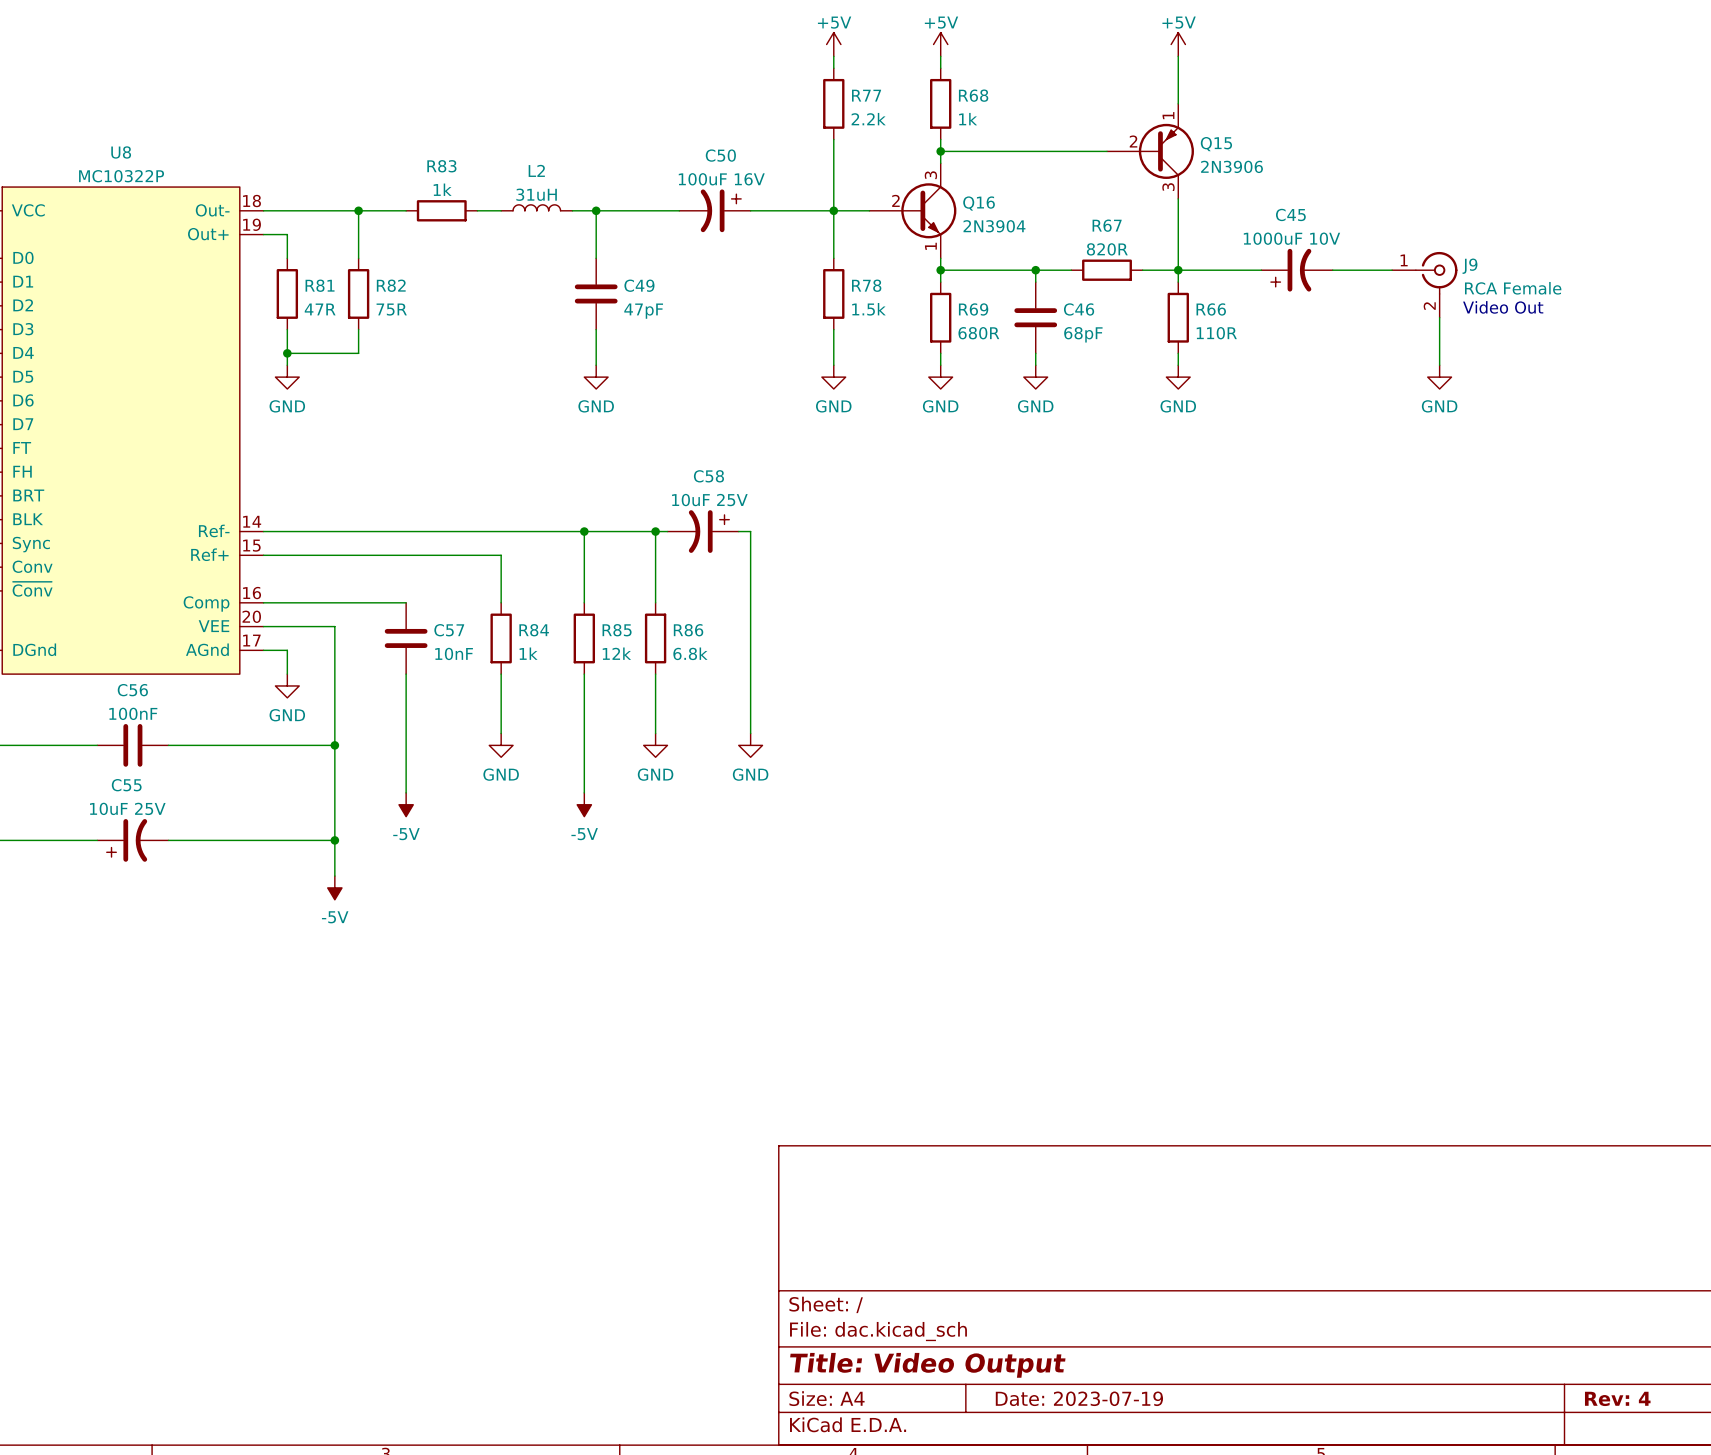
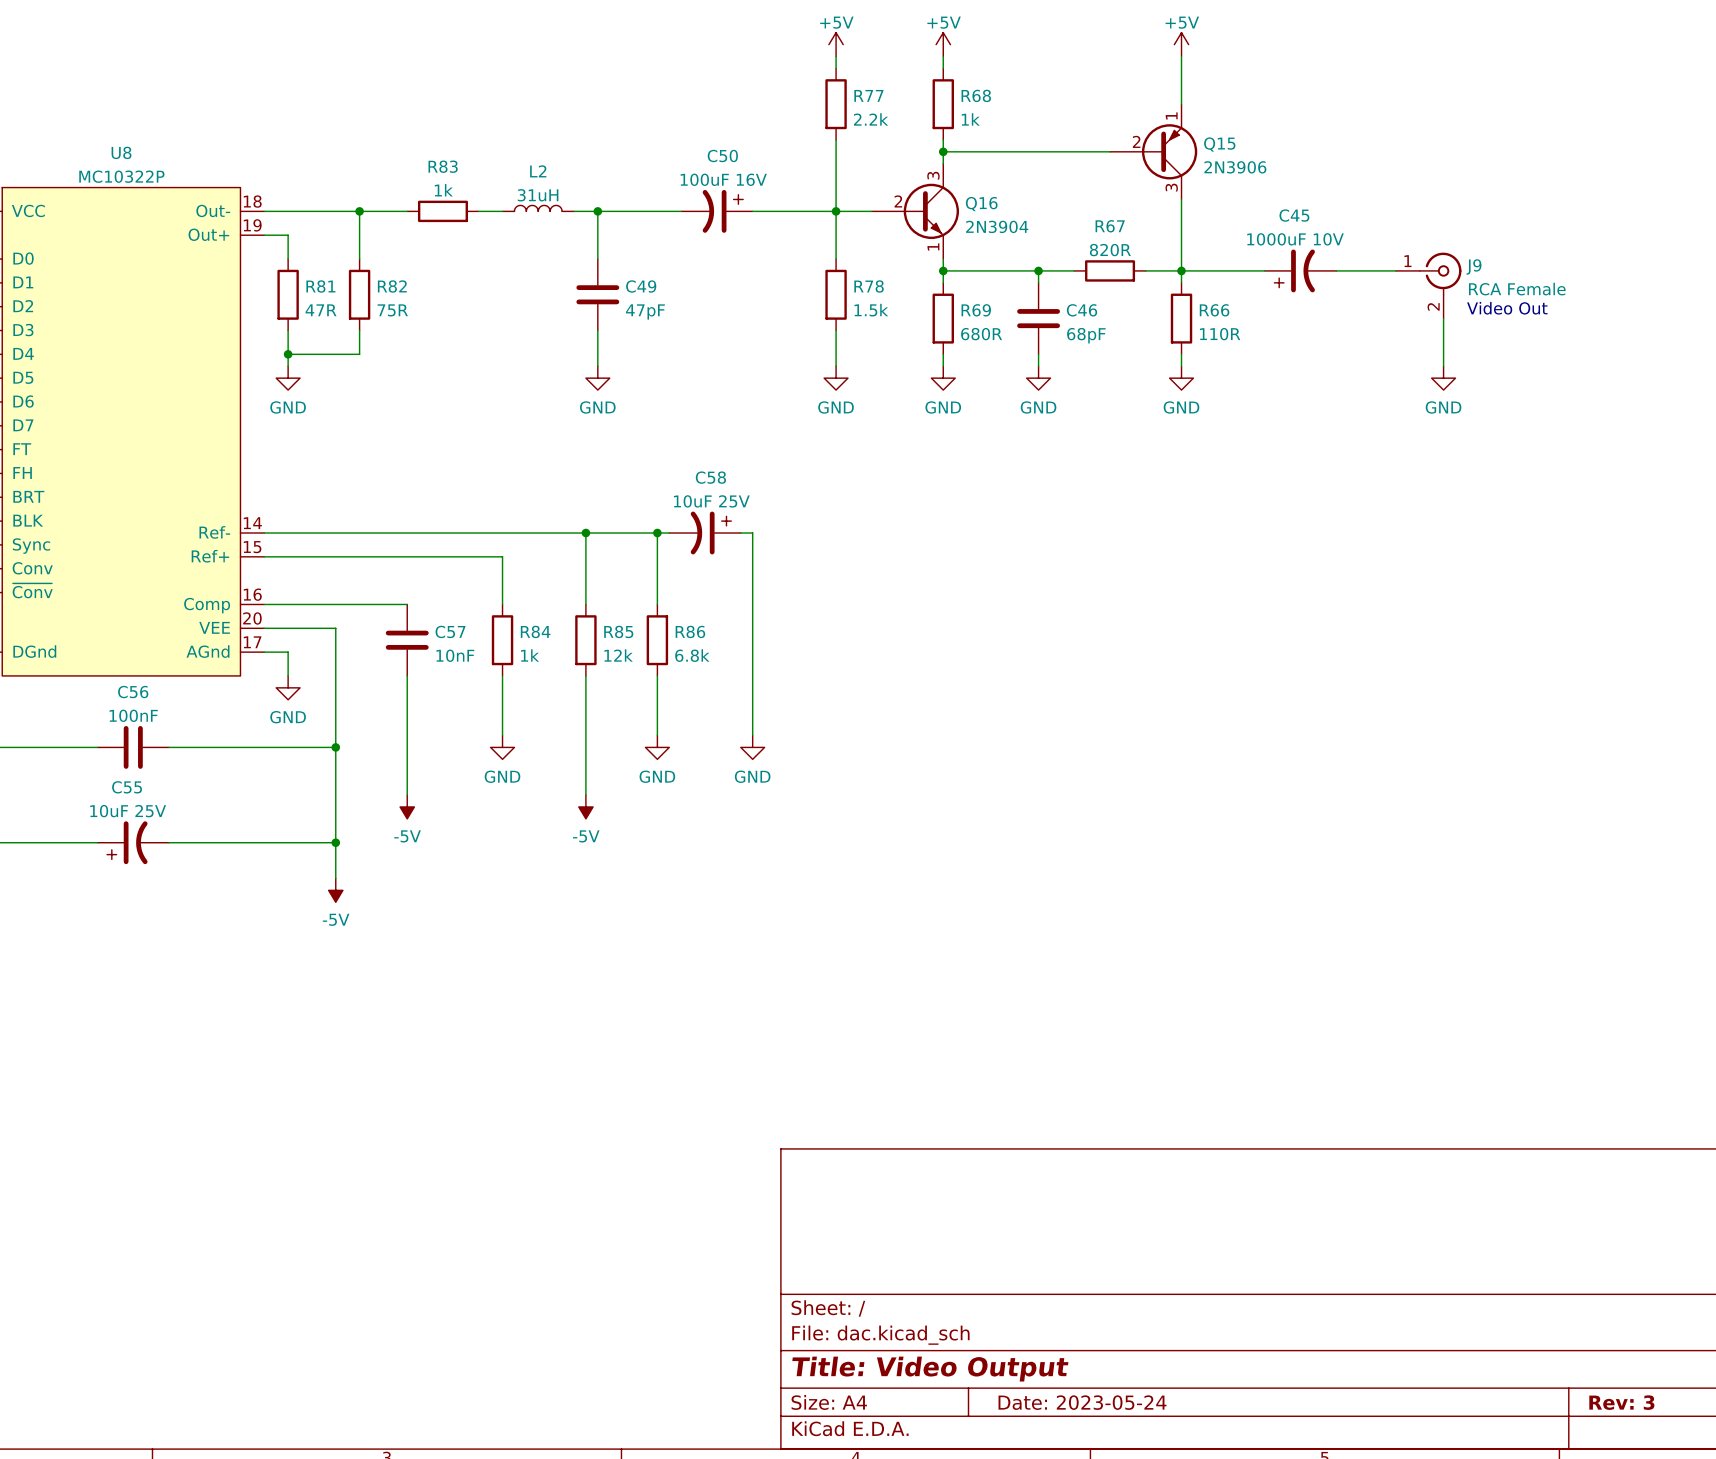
title block: Date: 2023-07-19 (1079, 1398) -> Date: 2023-05-24 (1082, 1402)
title block: Rev: 4 (1617, 1398) -> Rev: 3 (1621, 1402)

